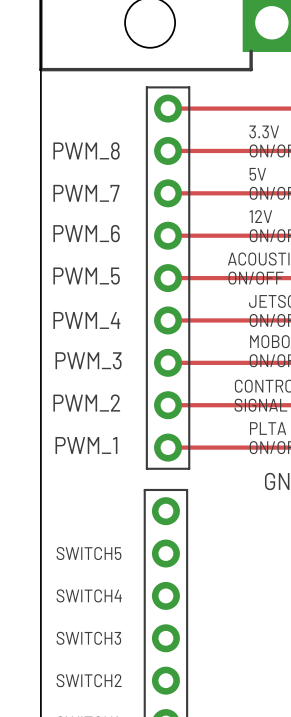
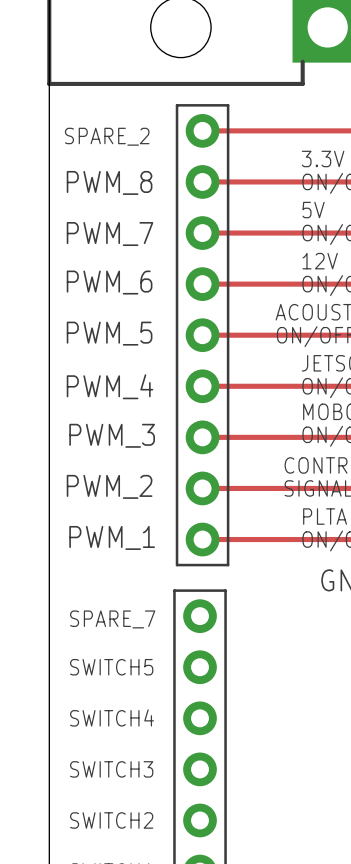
text: none -> SPARE_2 (107, 136)
text: none -> SPARE_7 (112, 619)

